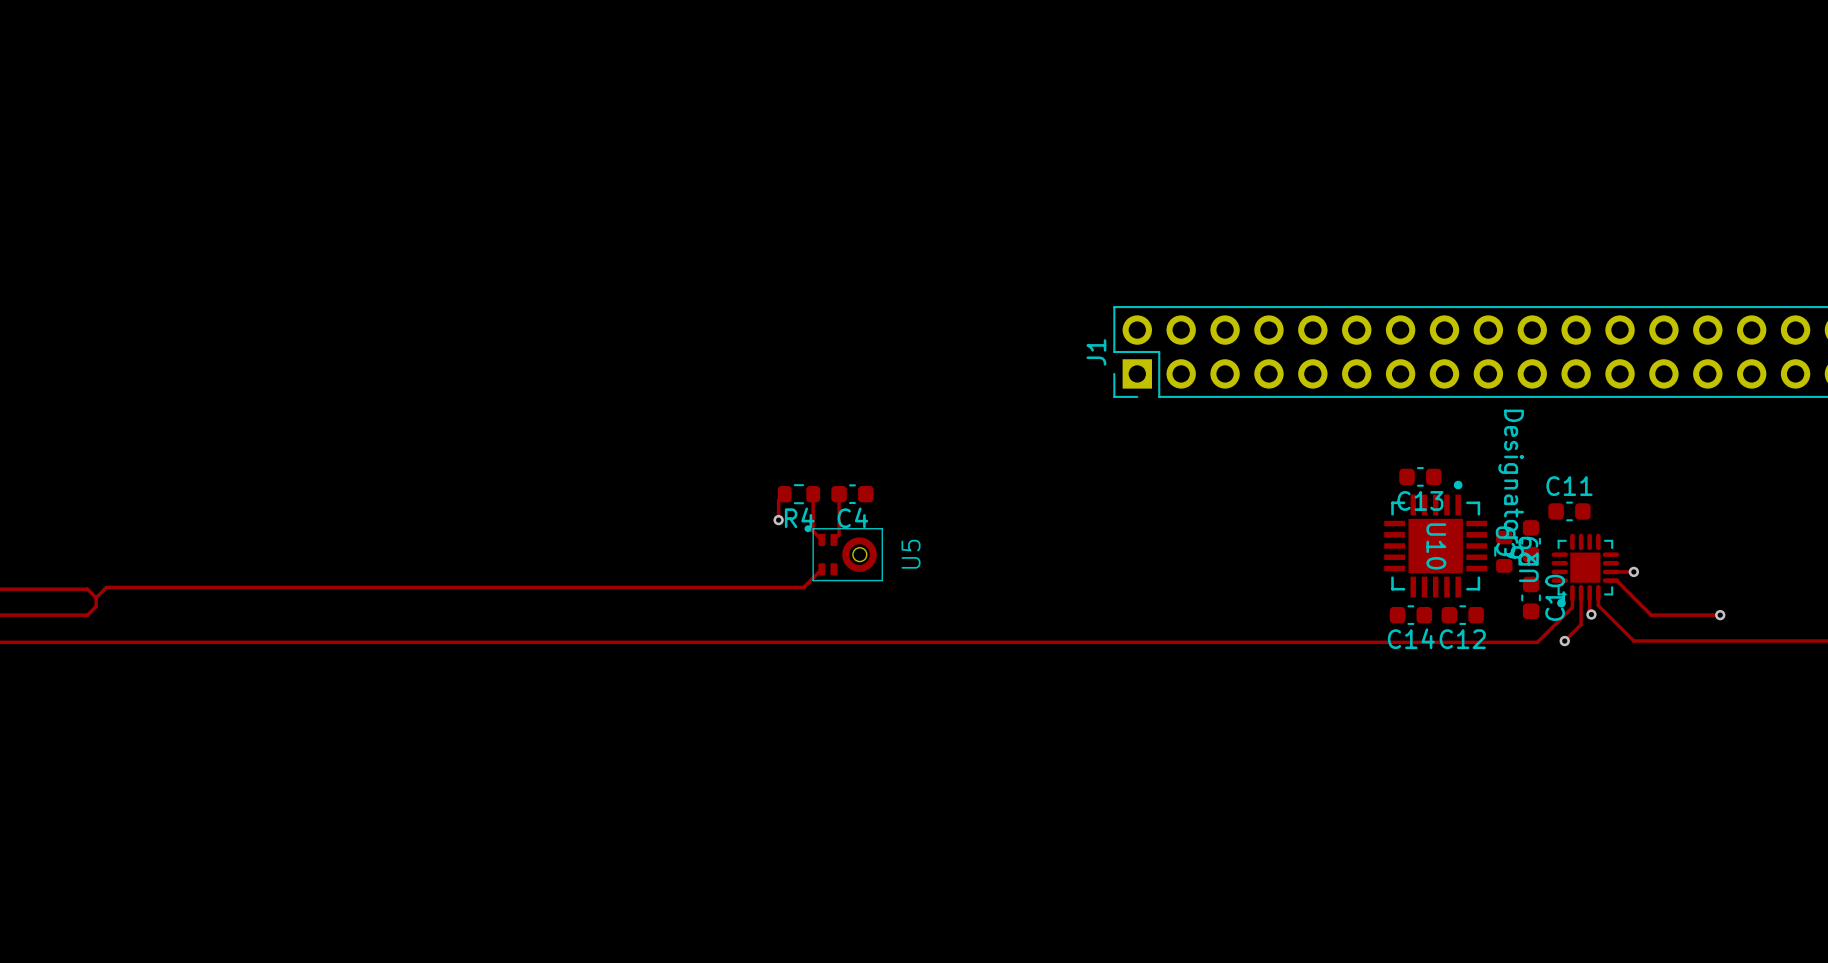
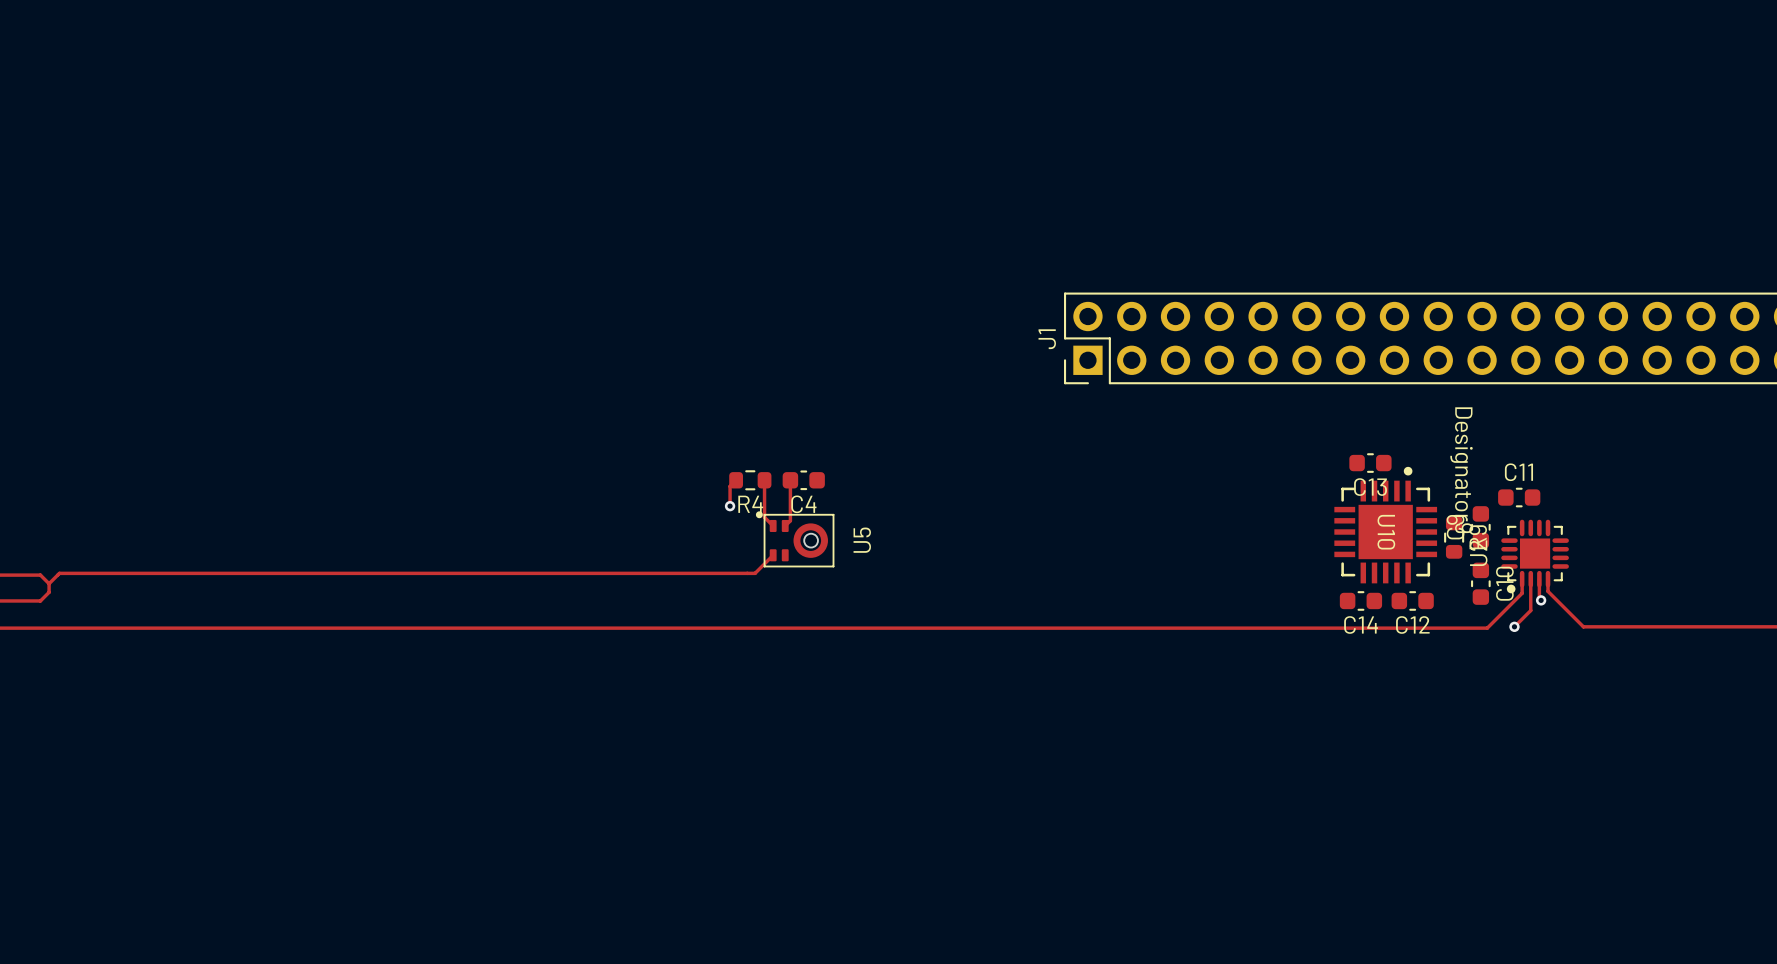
track: (1611, 571) (1633, 571) -> none
via: (1633, 571) -> none
track: (1611, 580) (1616, 580) (1651, 615) (1720, 615) -> none
via: (1720, 615) -> none

